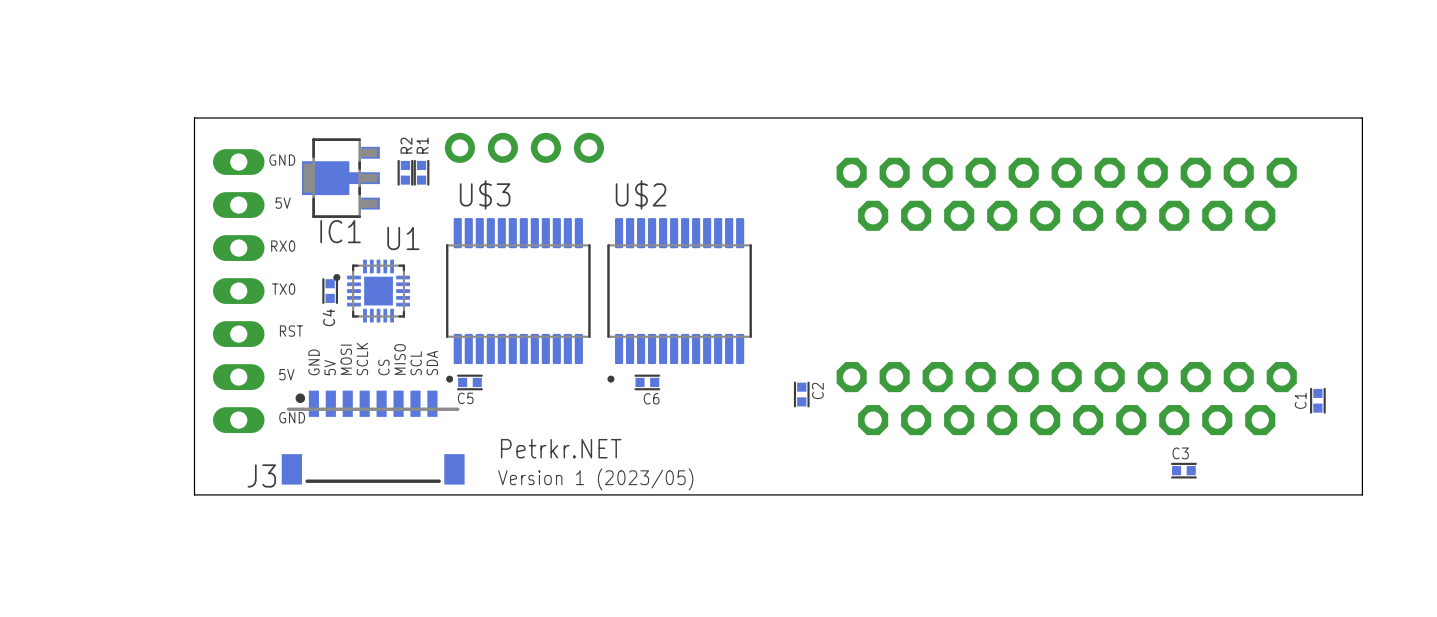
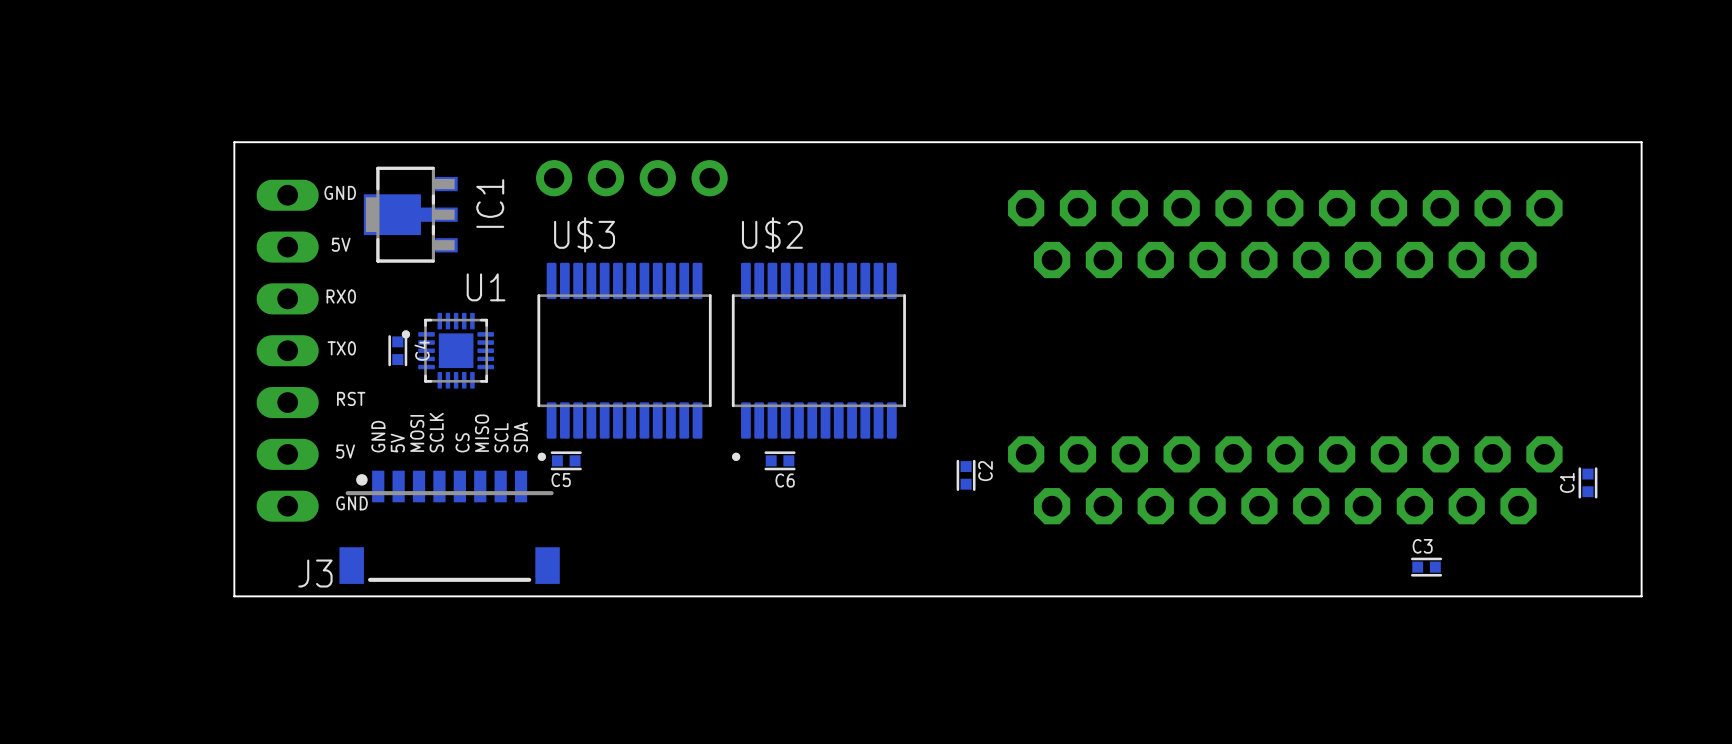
R2: (405, 172) -> none
R1: (421, 172) -> none
IC1 name rotation: 0° (340, 231) -> 90° counterclockwise (490, 203)
IC1 name position: IC1 (340, 231) -> IC1 (490, 203)
C4 name position: C4 (328, 317) -> C4 (422, 350)
text: Petrkr.NET (561, 448) -> none
text: Version 1 (2023/05) (595, 479) -> none

